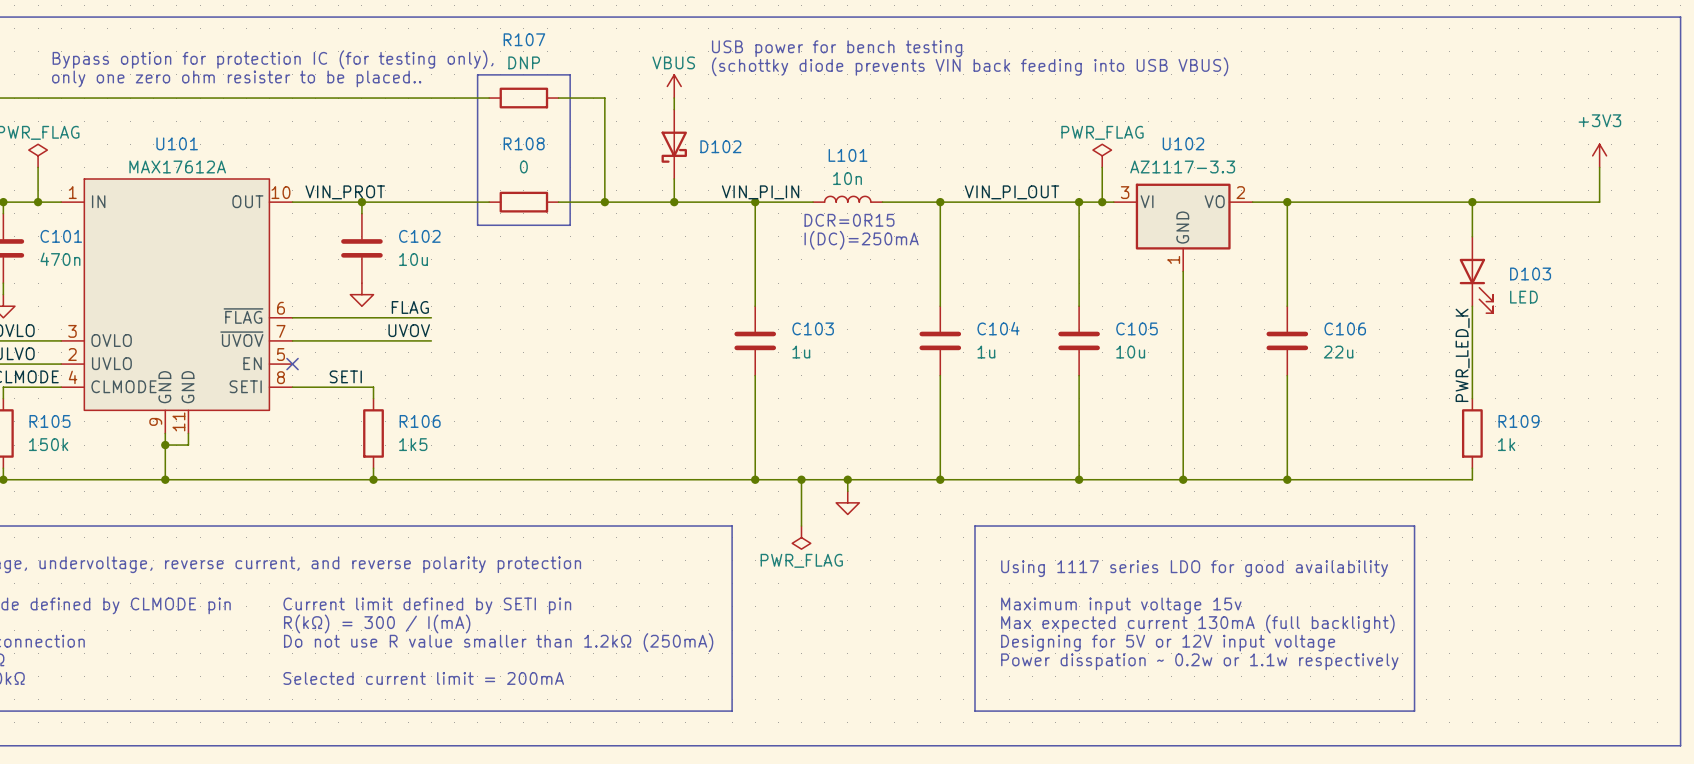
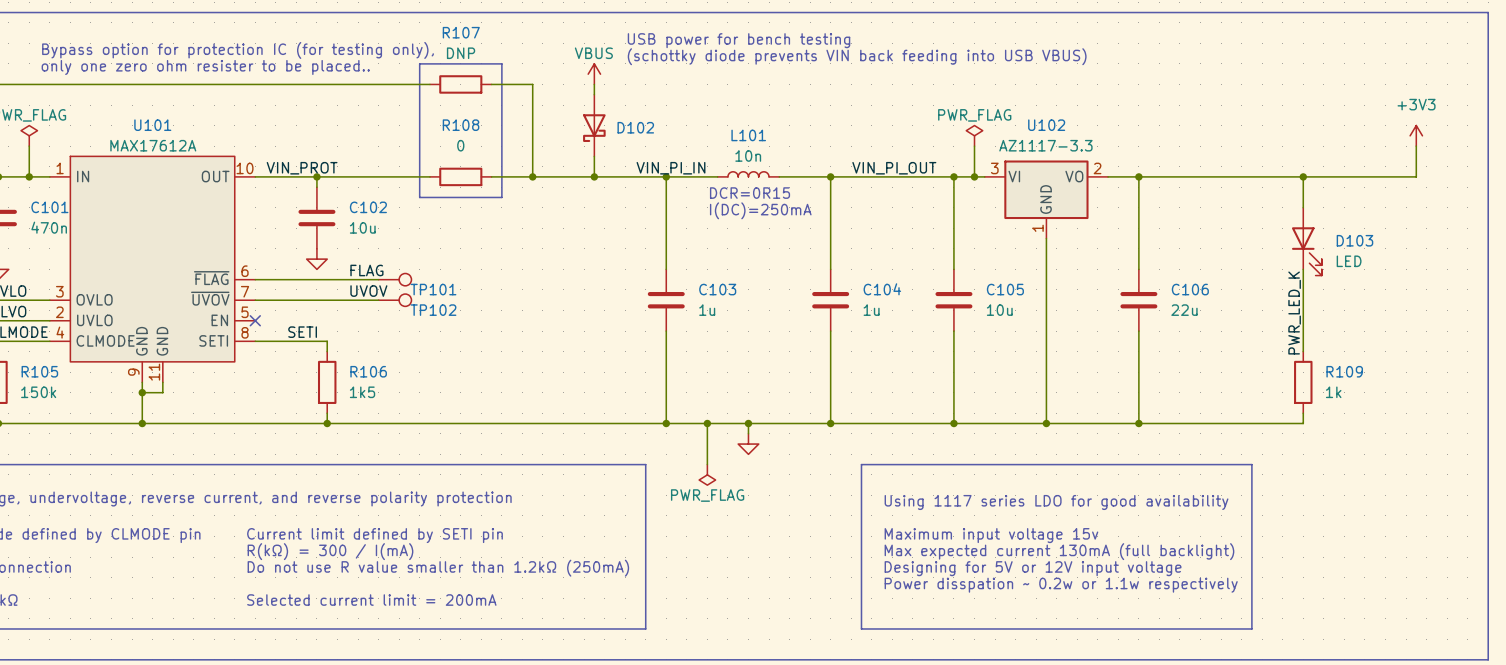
label position: FLAG (410, 307) -> FLAG (366, 270)
TP101: none -> (395, 279)
label position: UVOV (409, 330) -> UVOV (368, 291)
TP102: none -> (395, 300)

